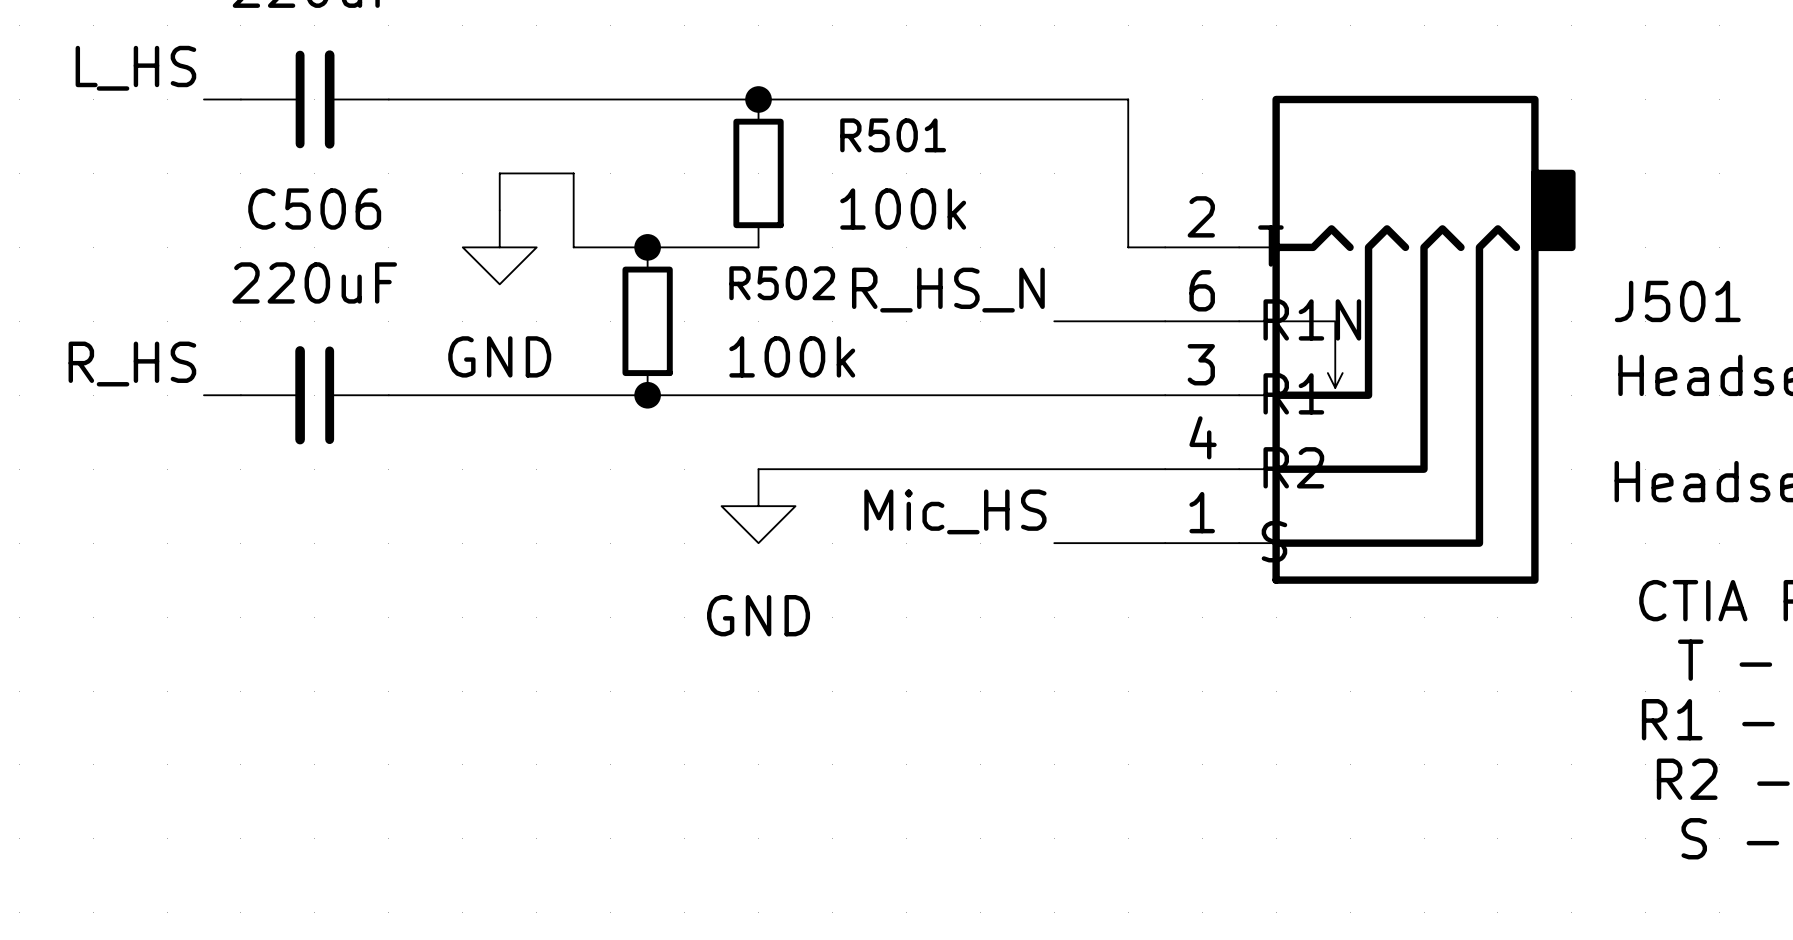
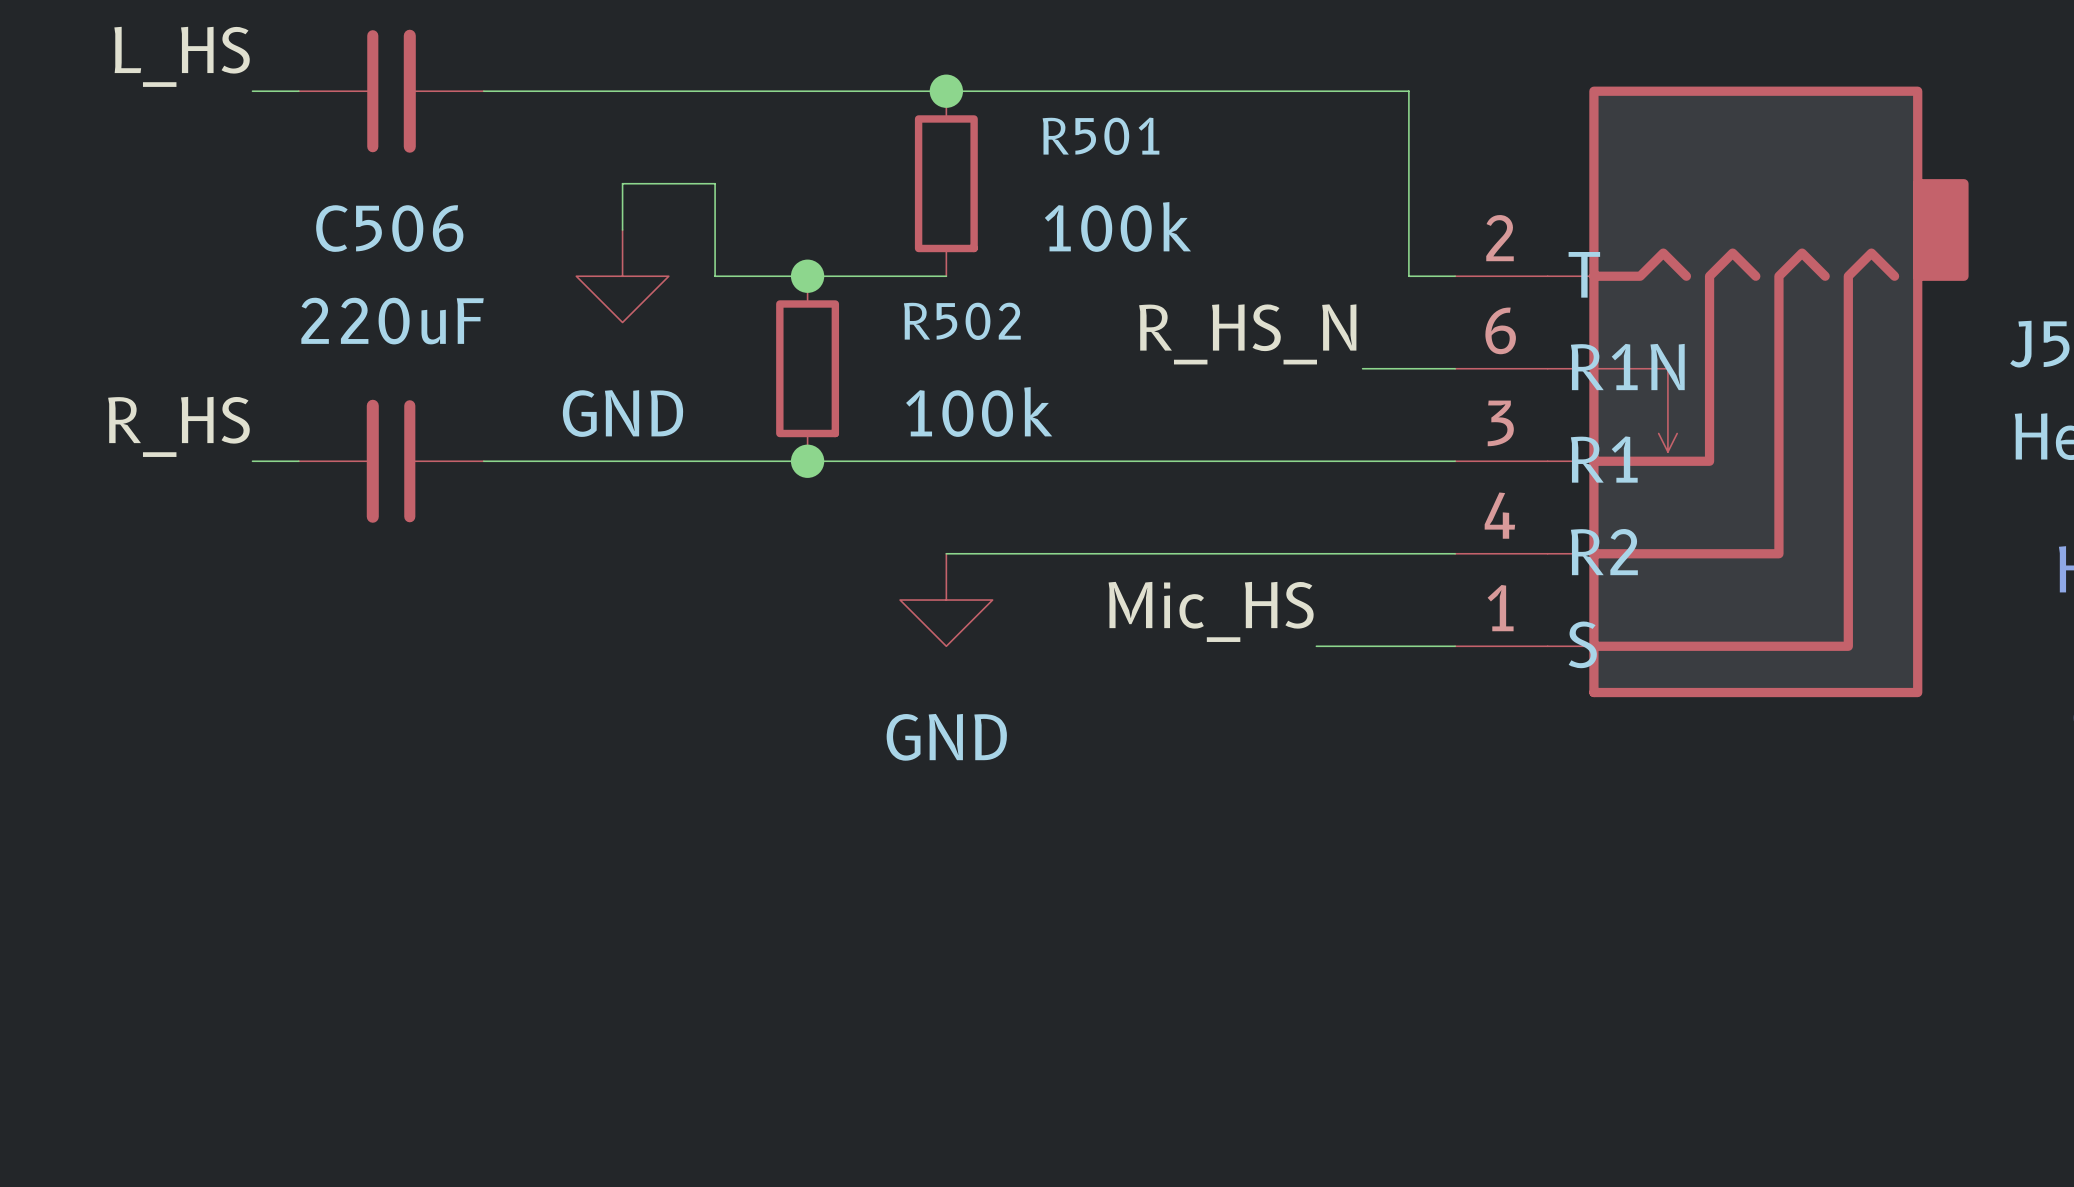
label position: R_HS_N (948, 290) -> R_HS_N (1247, 334)
wire: (1054, 321) (1091, 321) -> none

